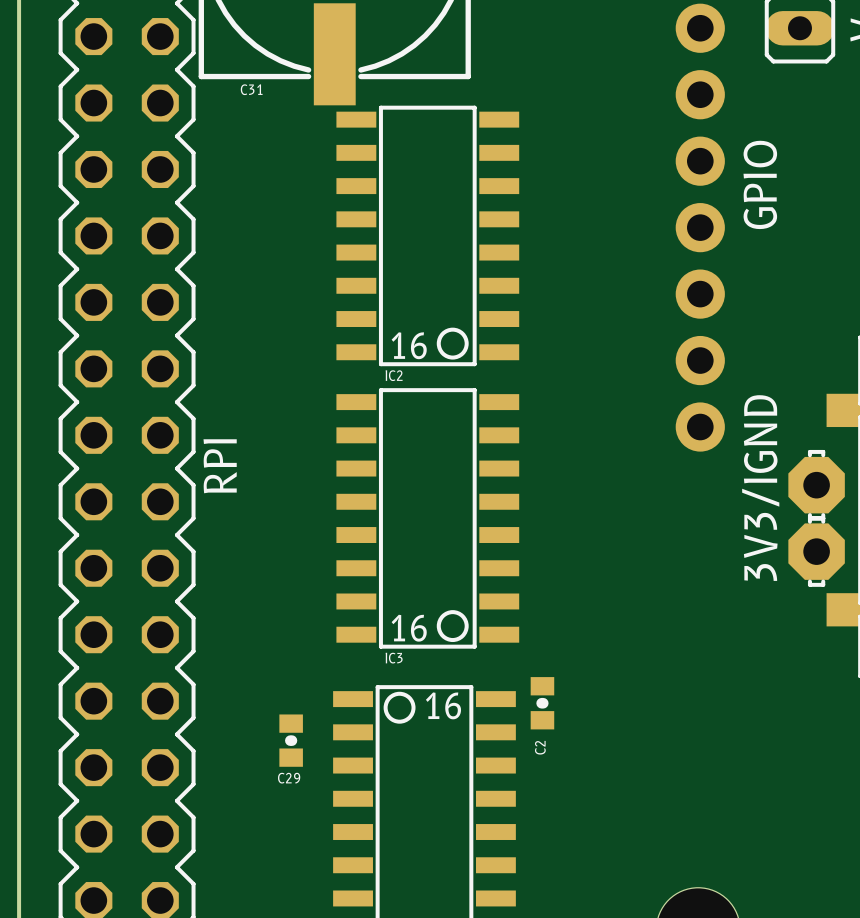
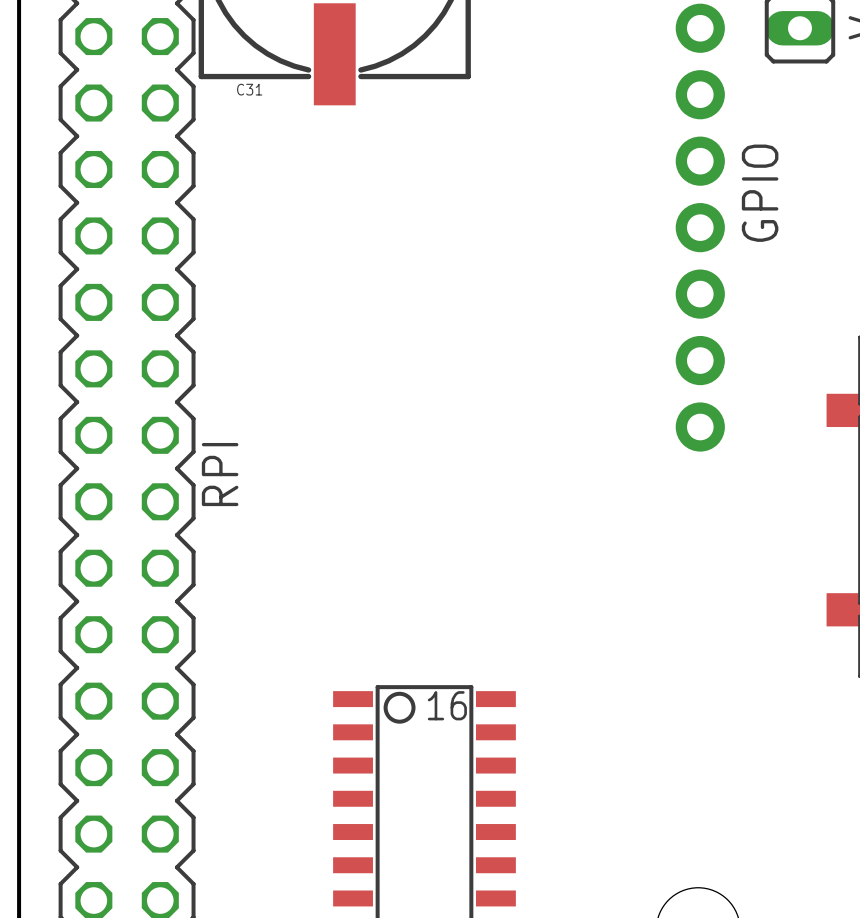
IC2: (427, 235) -> none
part: (816, 485) -> none
text: 3V3/IGND (760, 488) -> none
IC3: (427, 518) -> none
part: (816, 551) -> none
C2: (542, 703) -> none
C29: (291, 740) -> none

